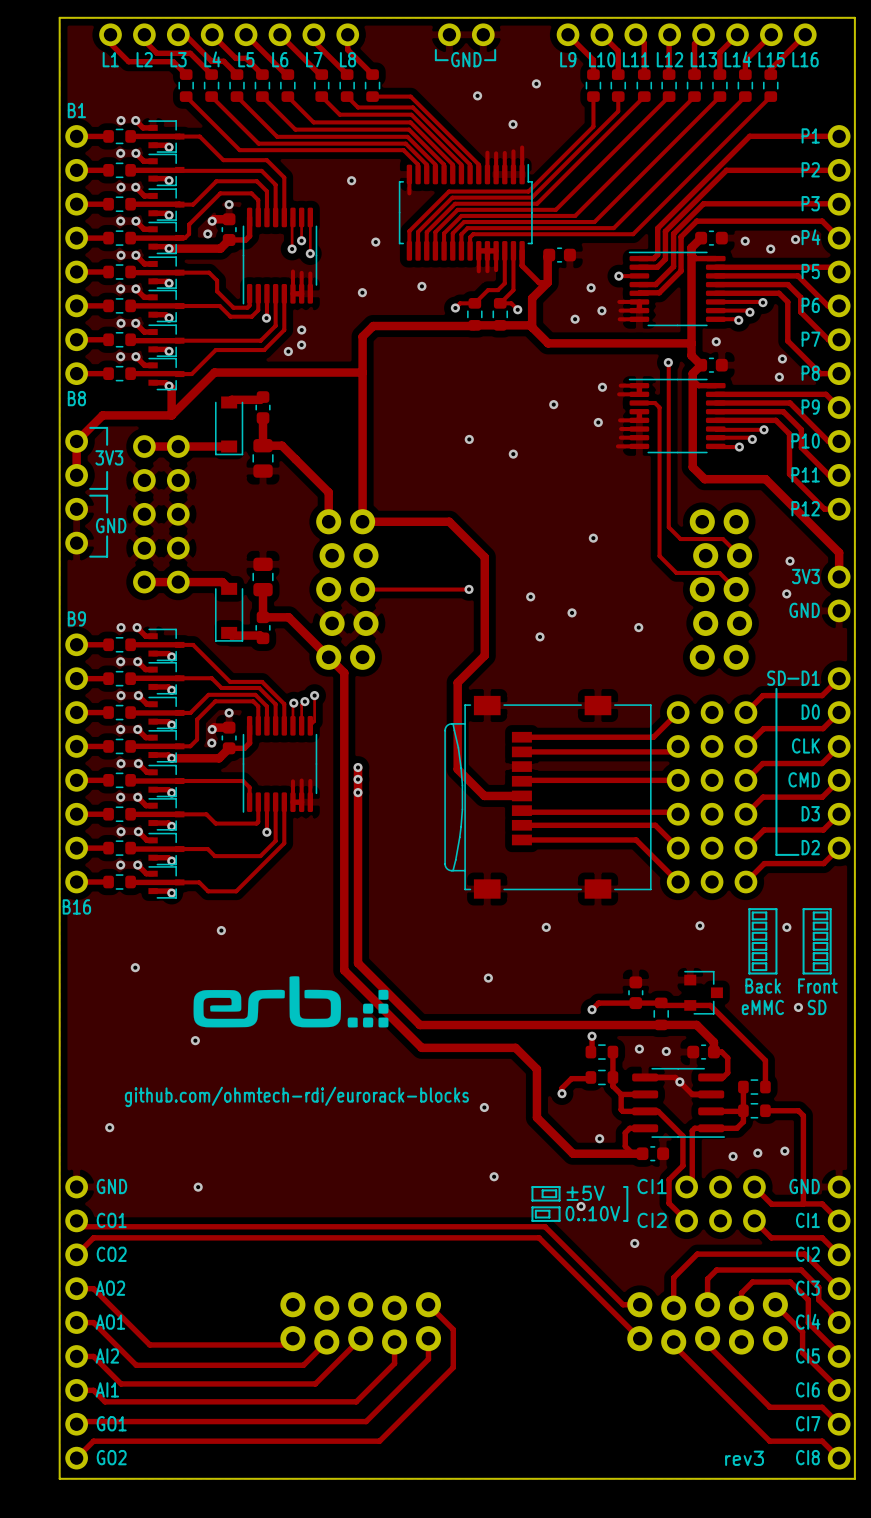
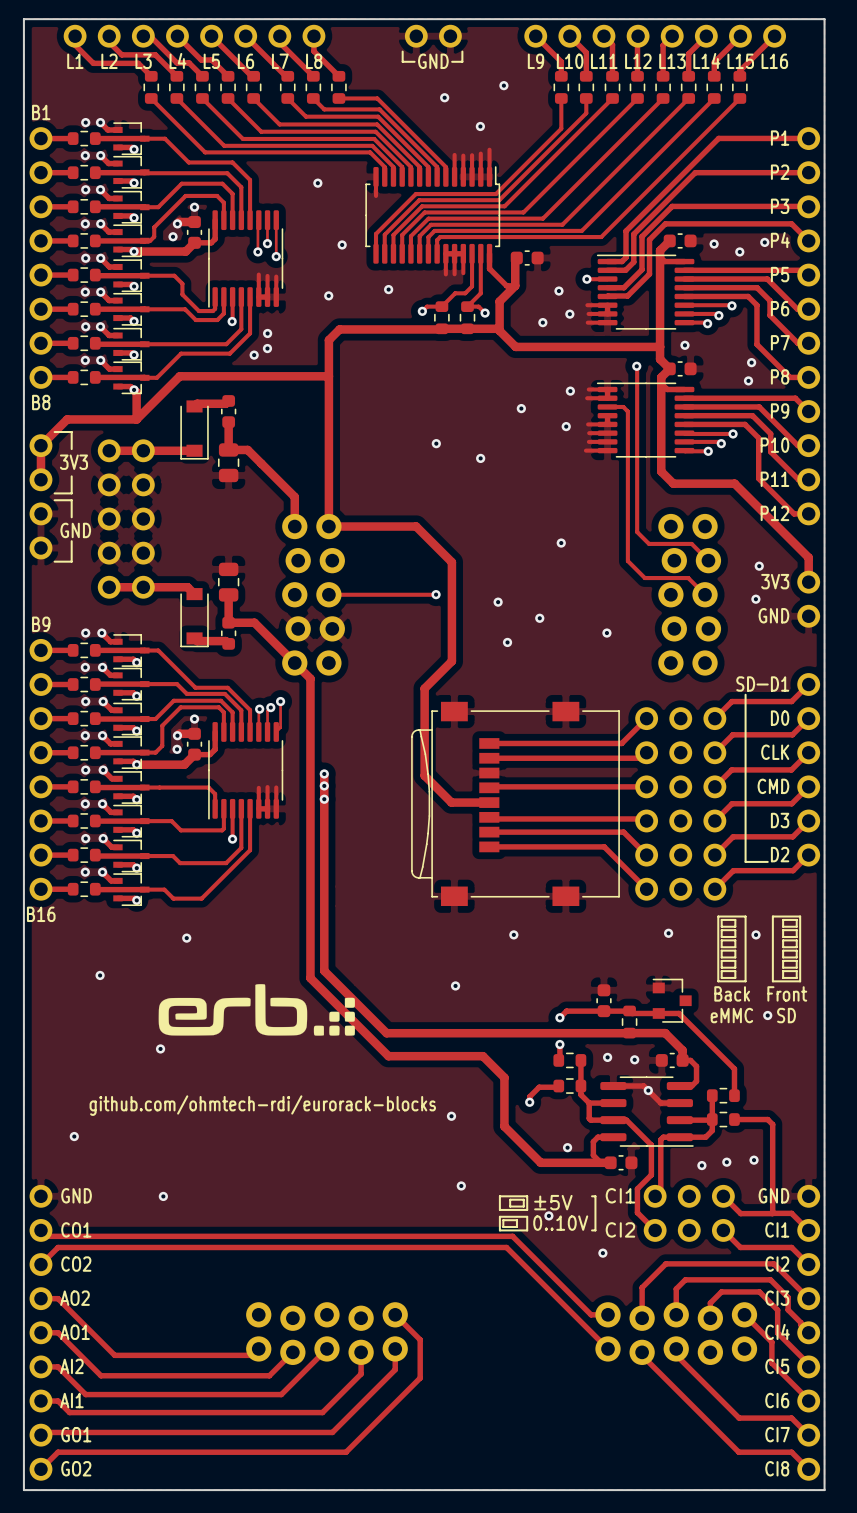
text: rev3 (744, 1458) -> none

